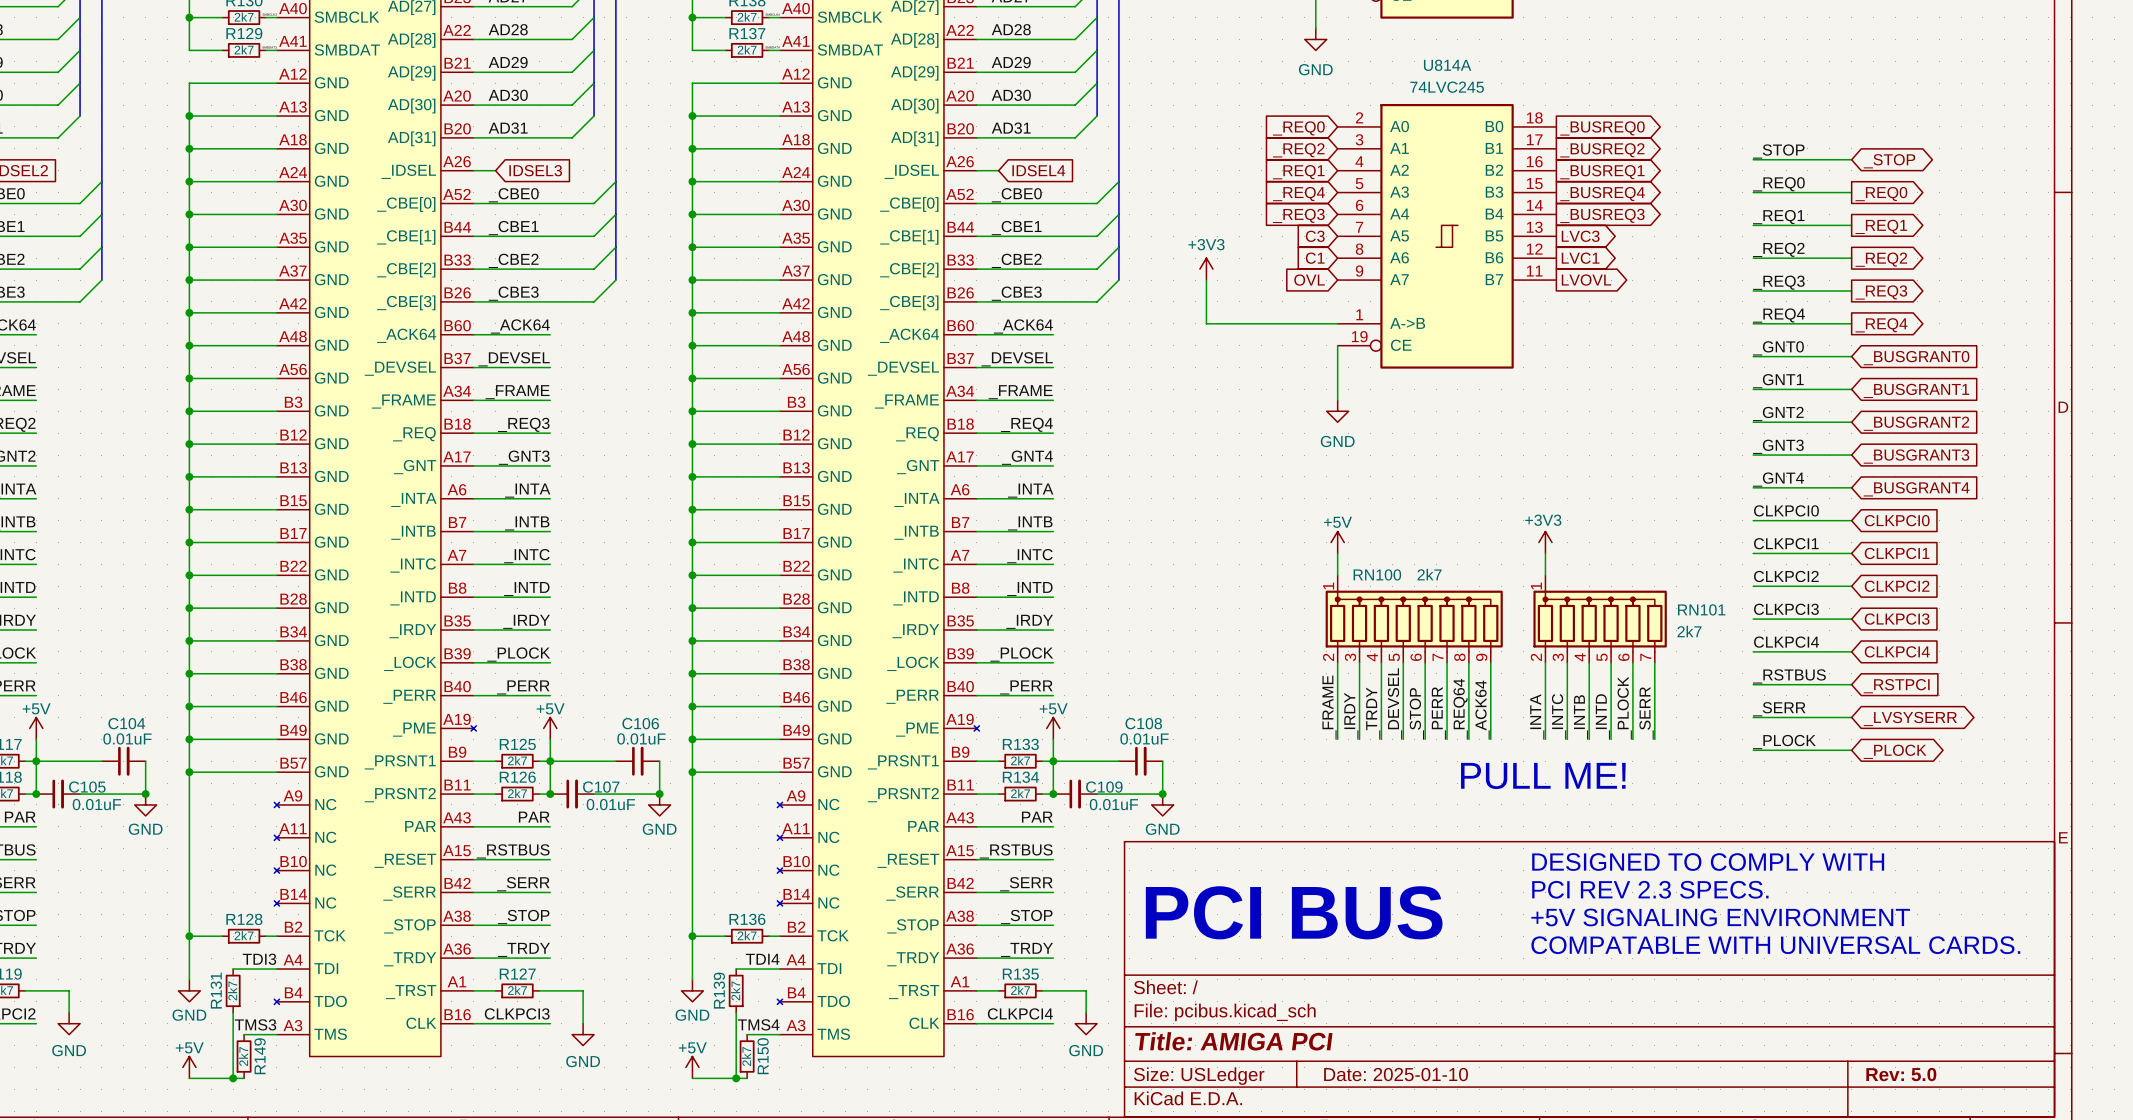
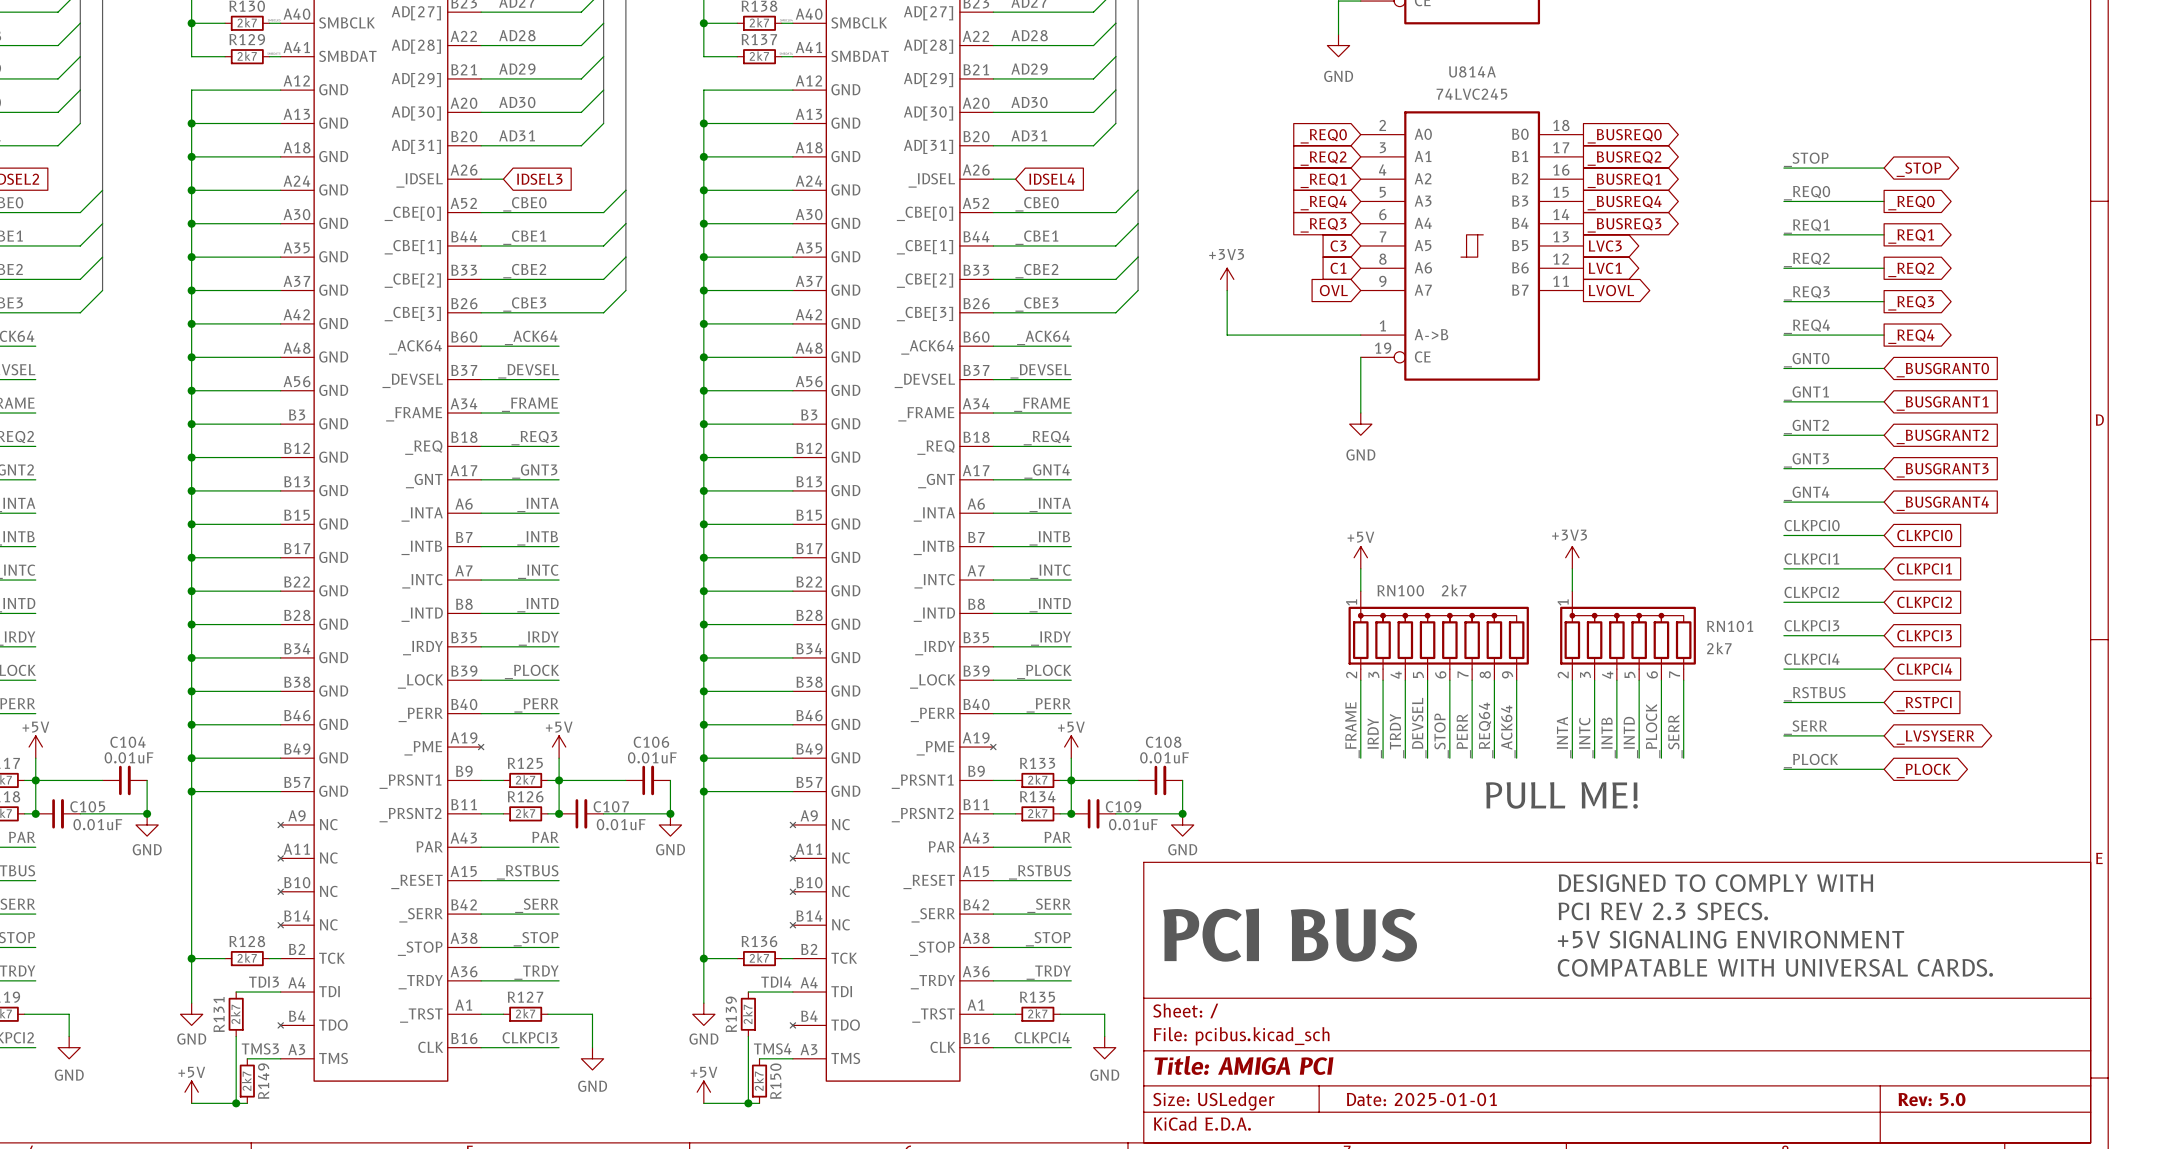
title block: Date: 2025-01-10 (1396, 1074) -> Date: 2025-01-01 (1421, 1099)

